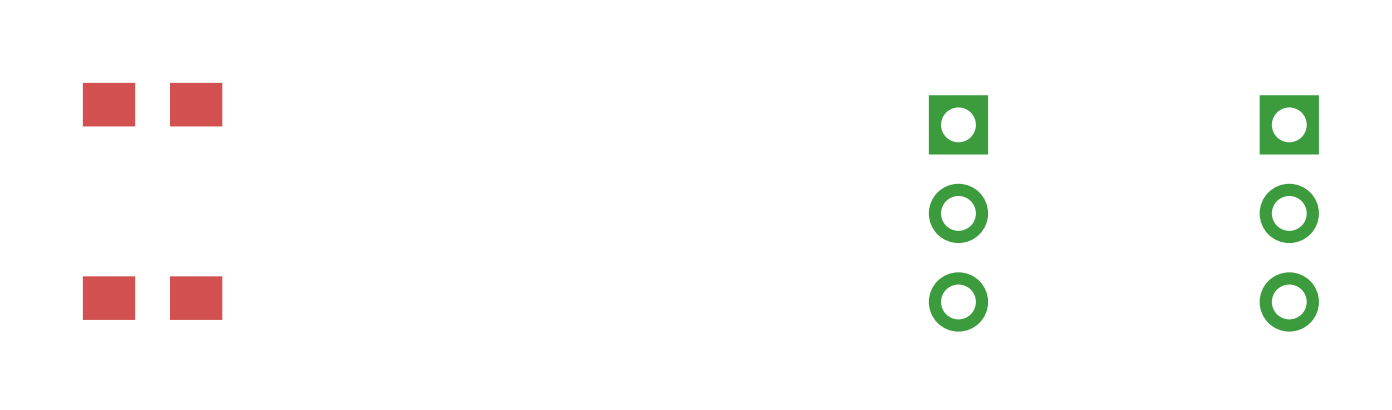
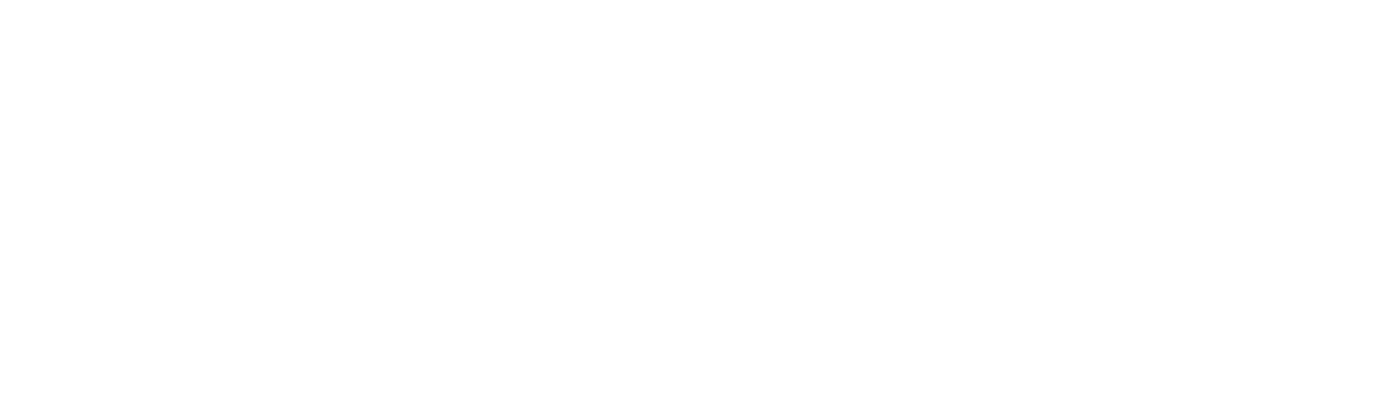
part: (152, 104) -> none
part: (958, 213) -> none
part: (1289, 213) -> none
part: (152, 298) -> none

